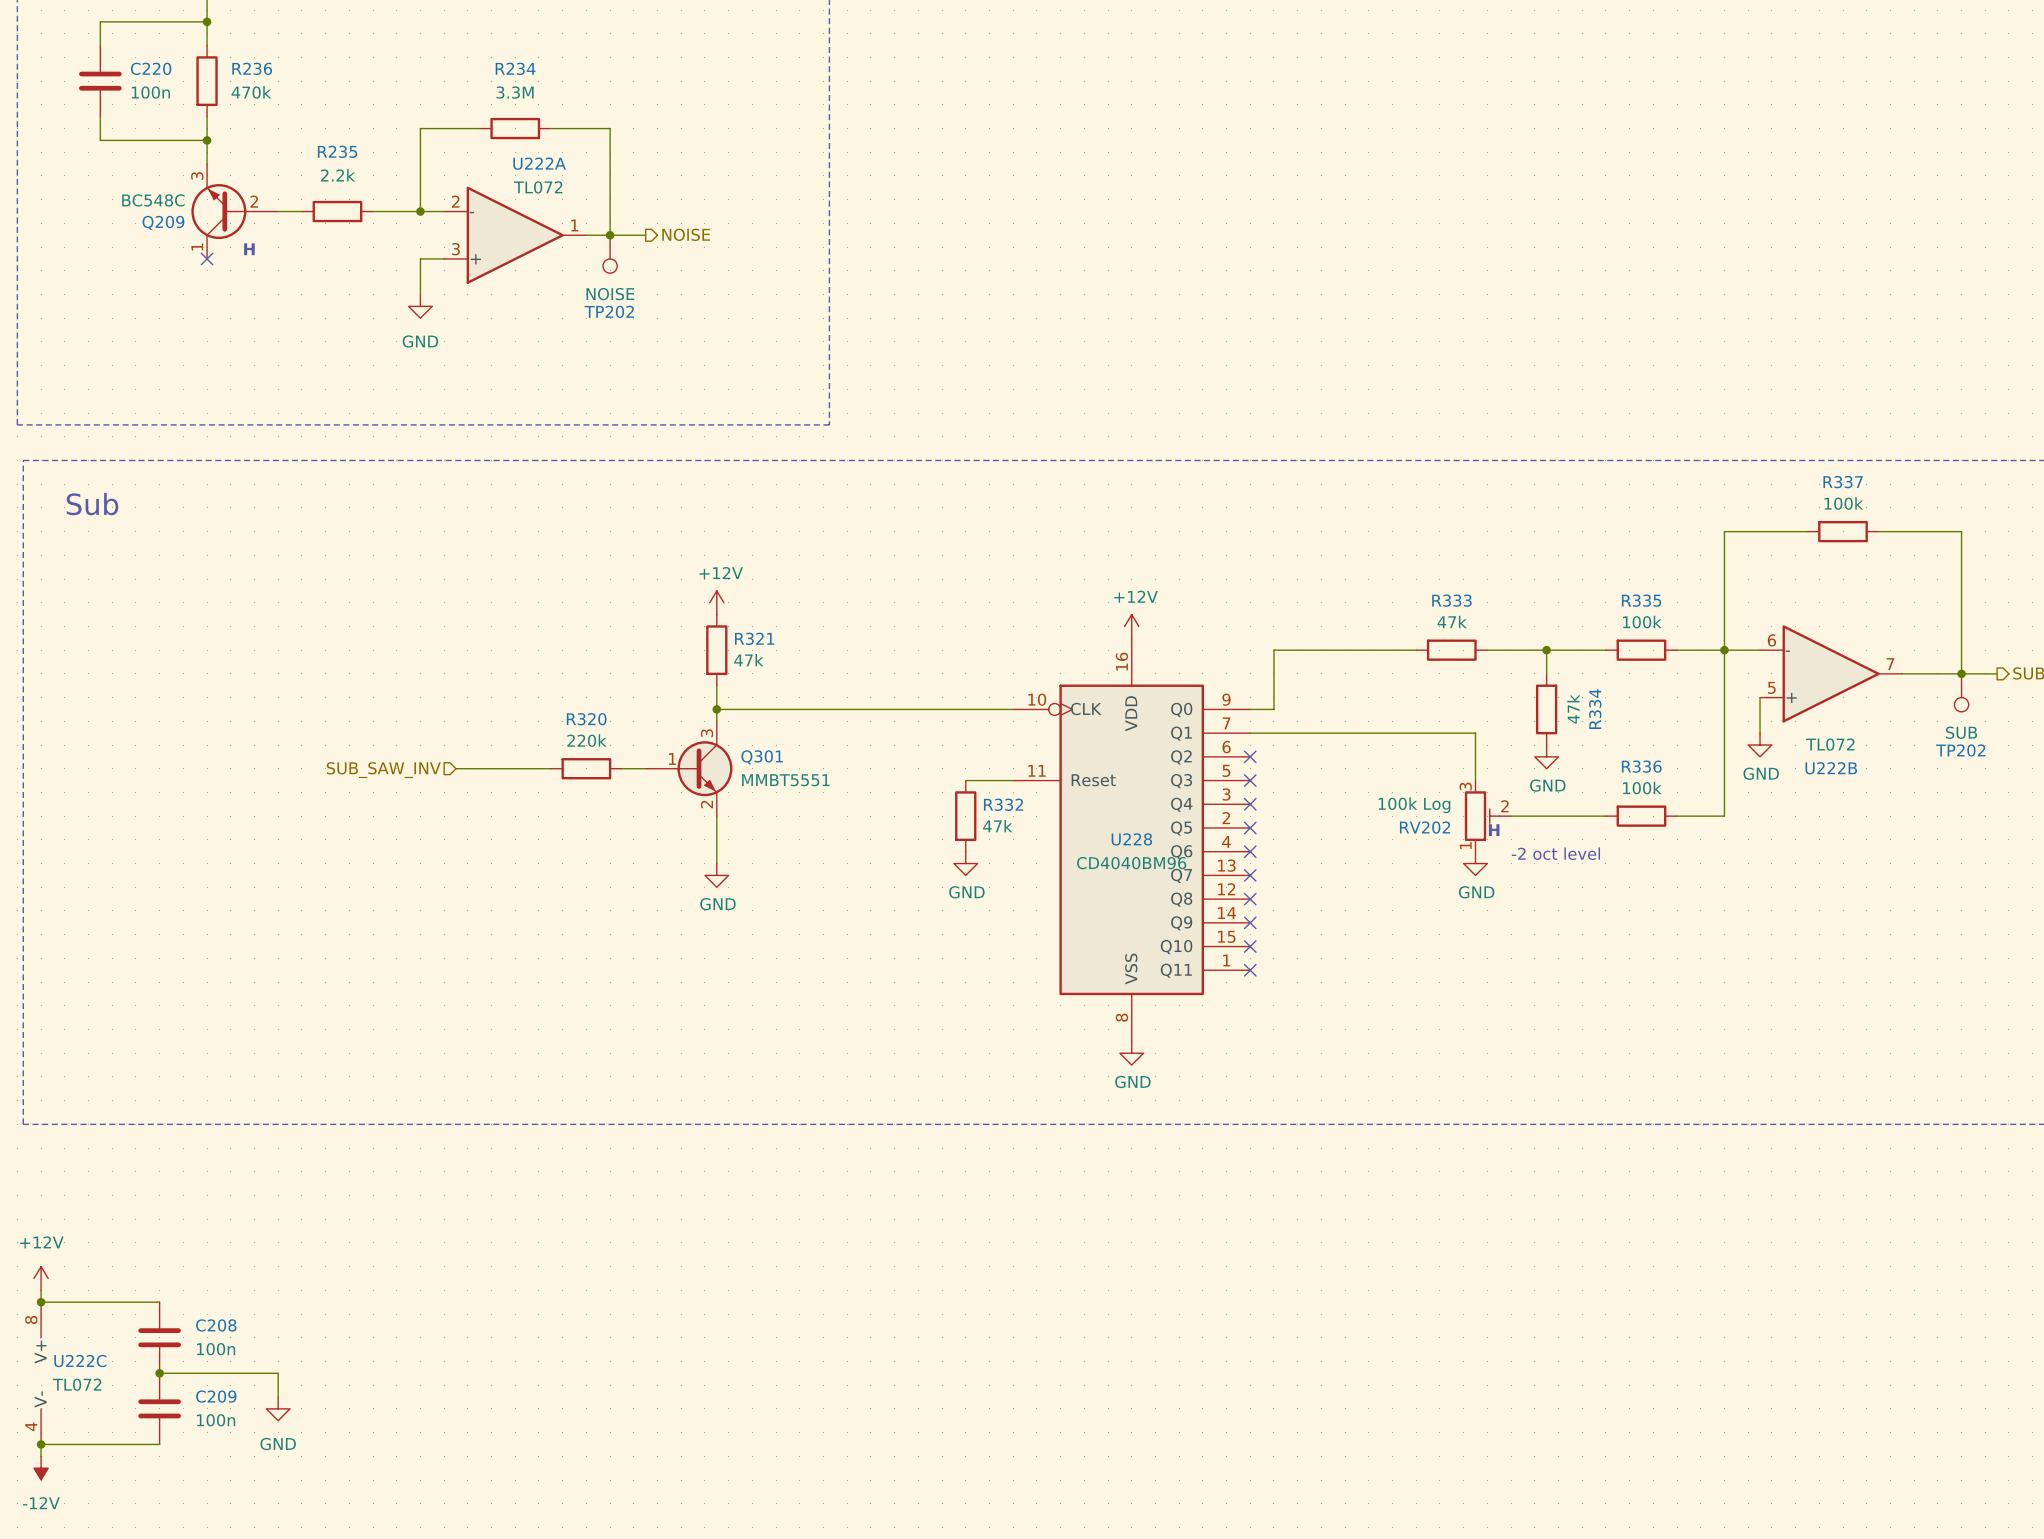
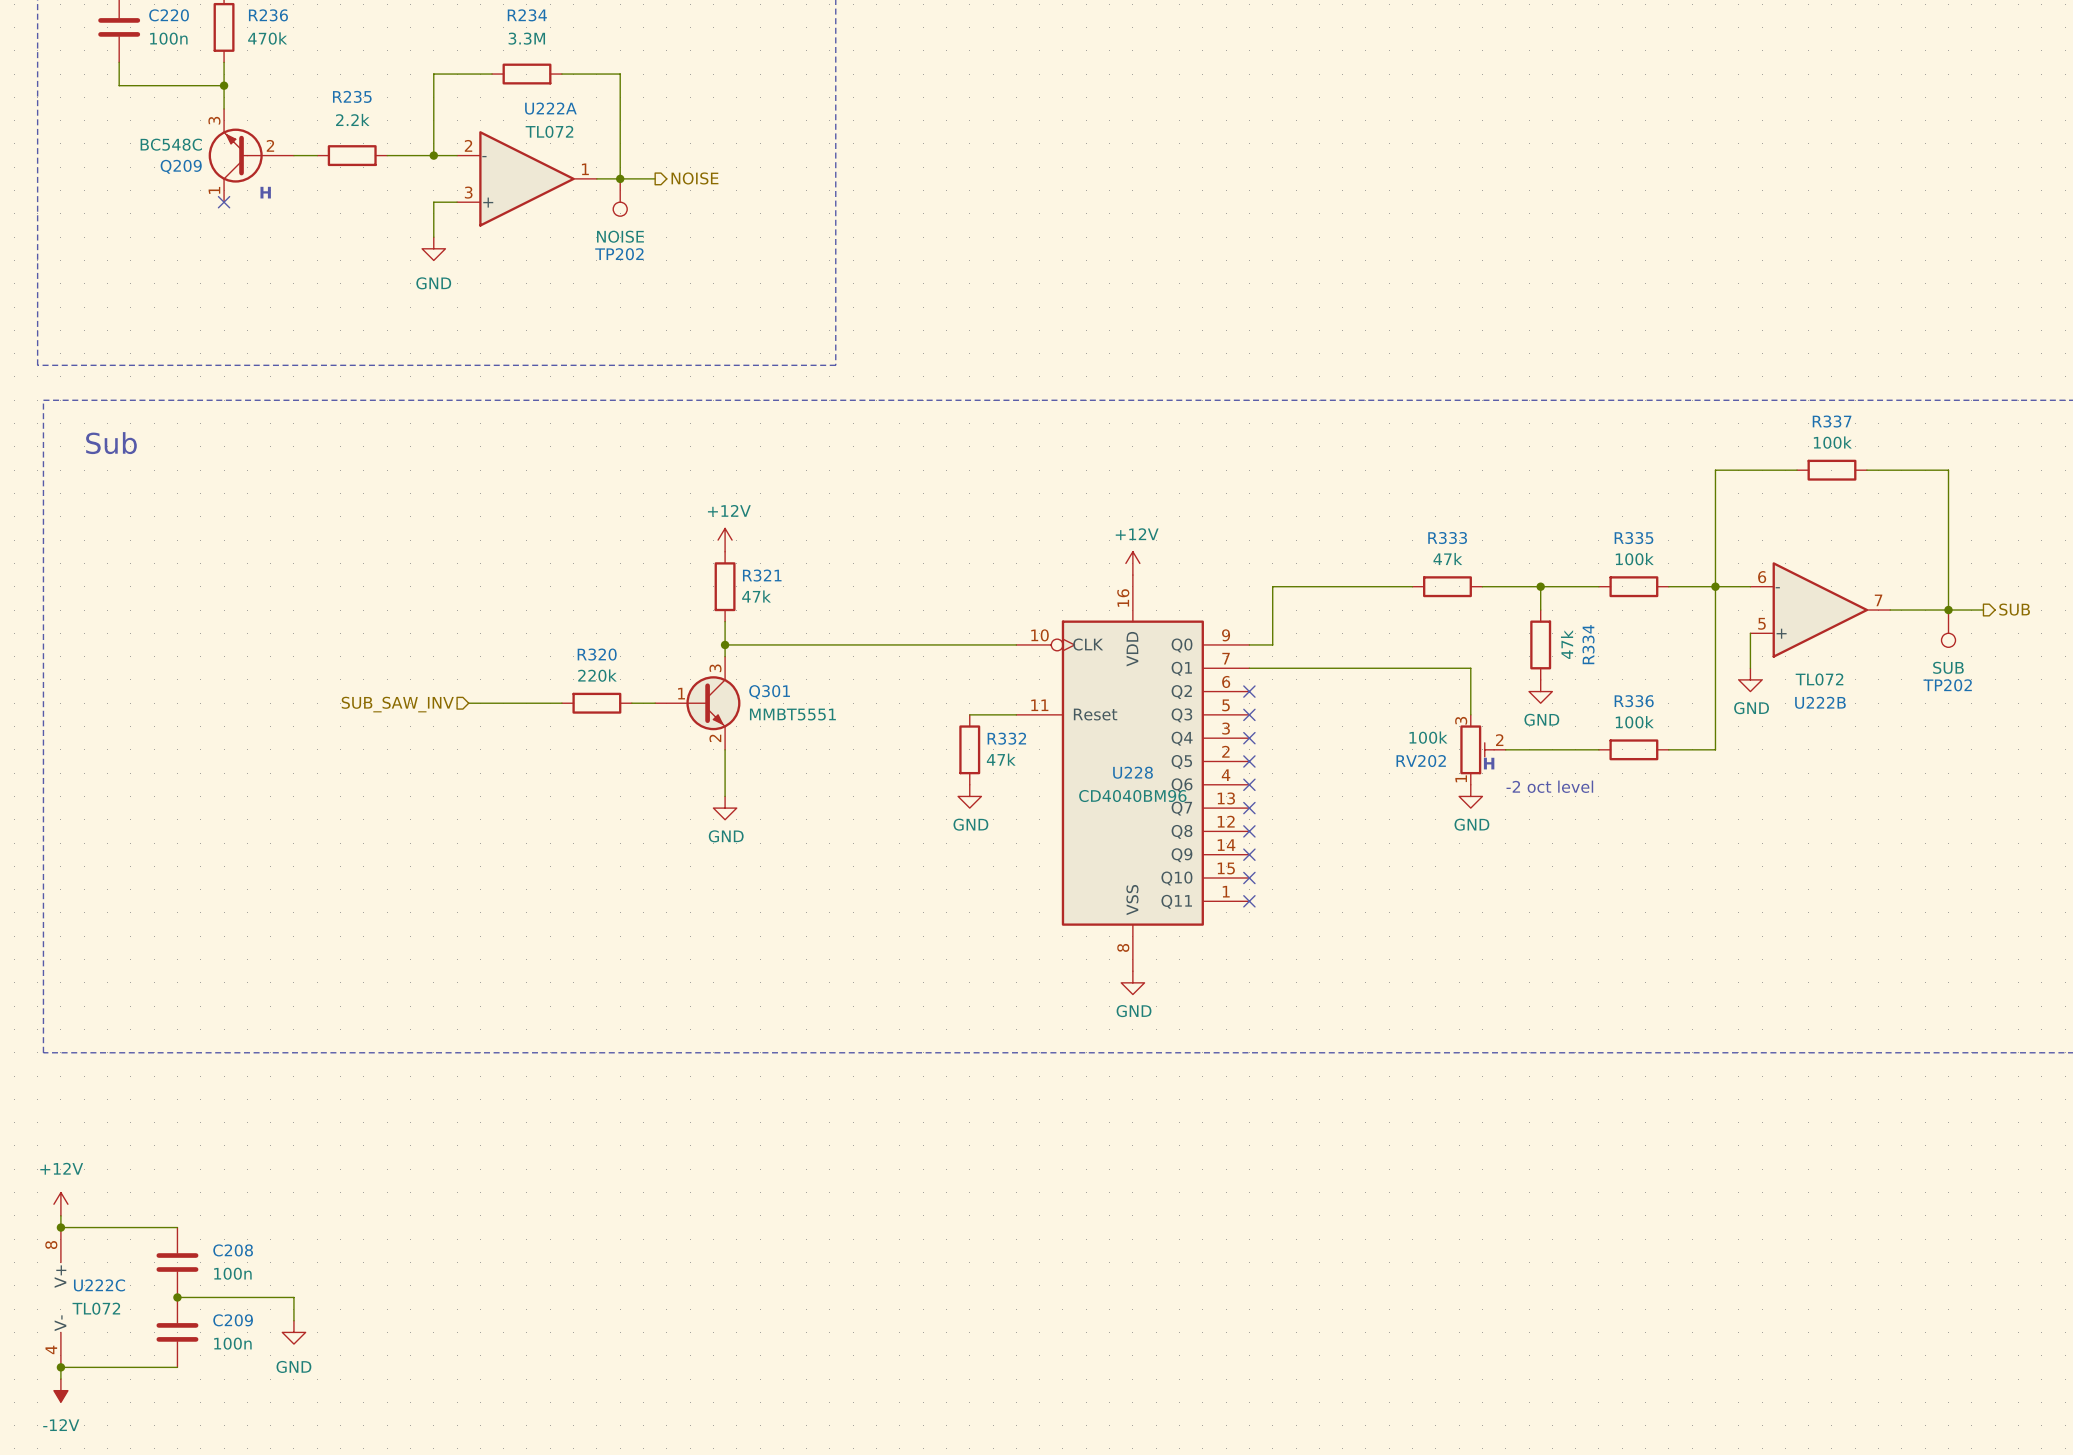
RV202 value: 100k Log (1414, 805) -> 100k (1428, 737)

